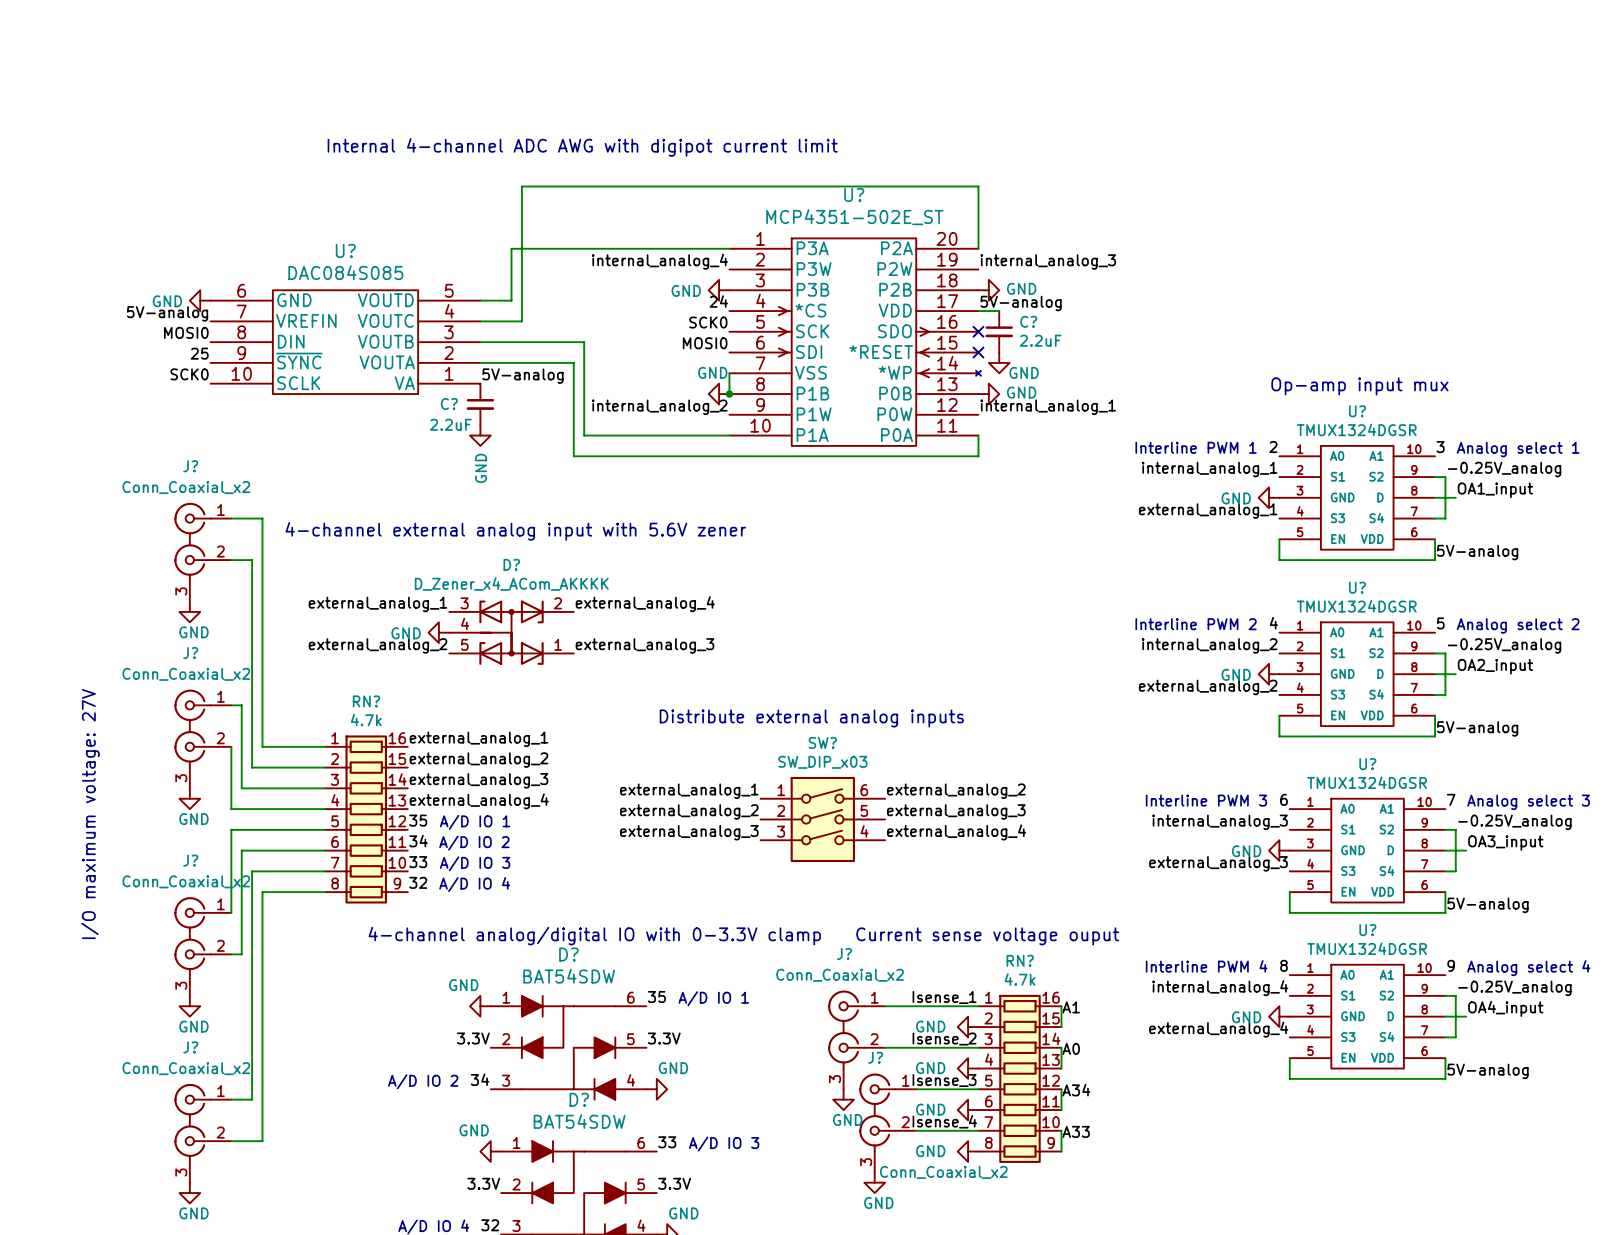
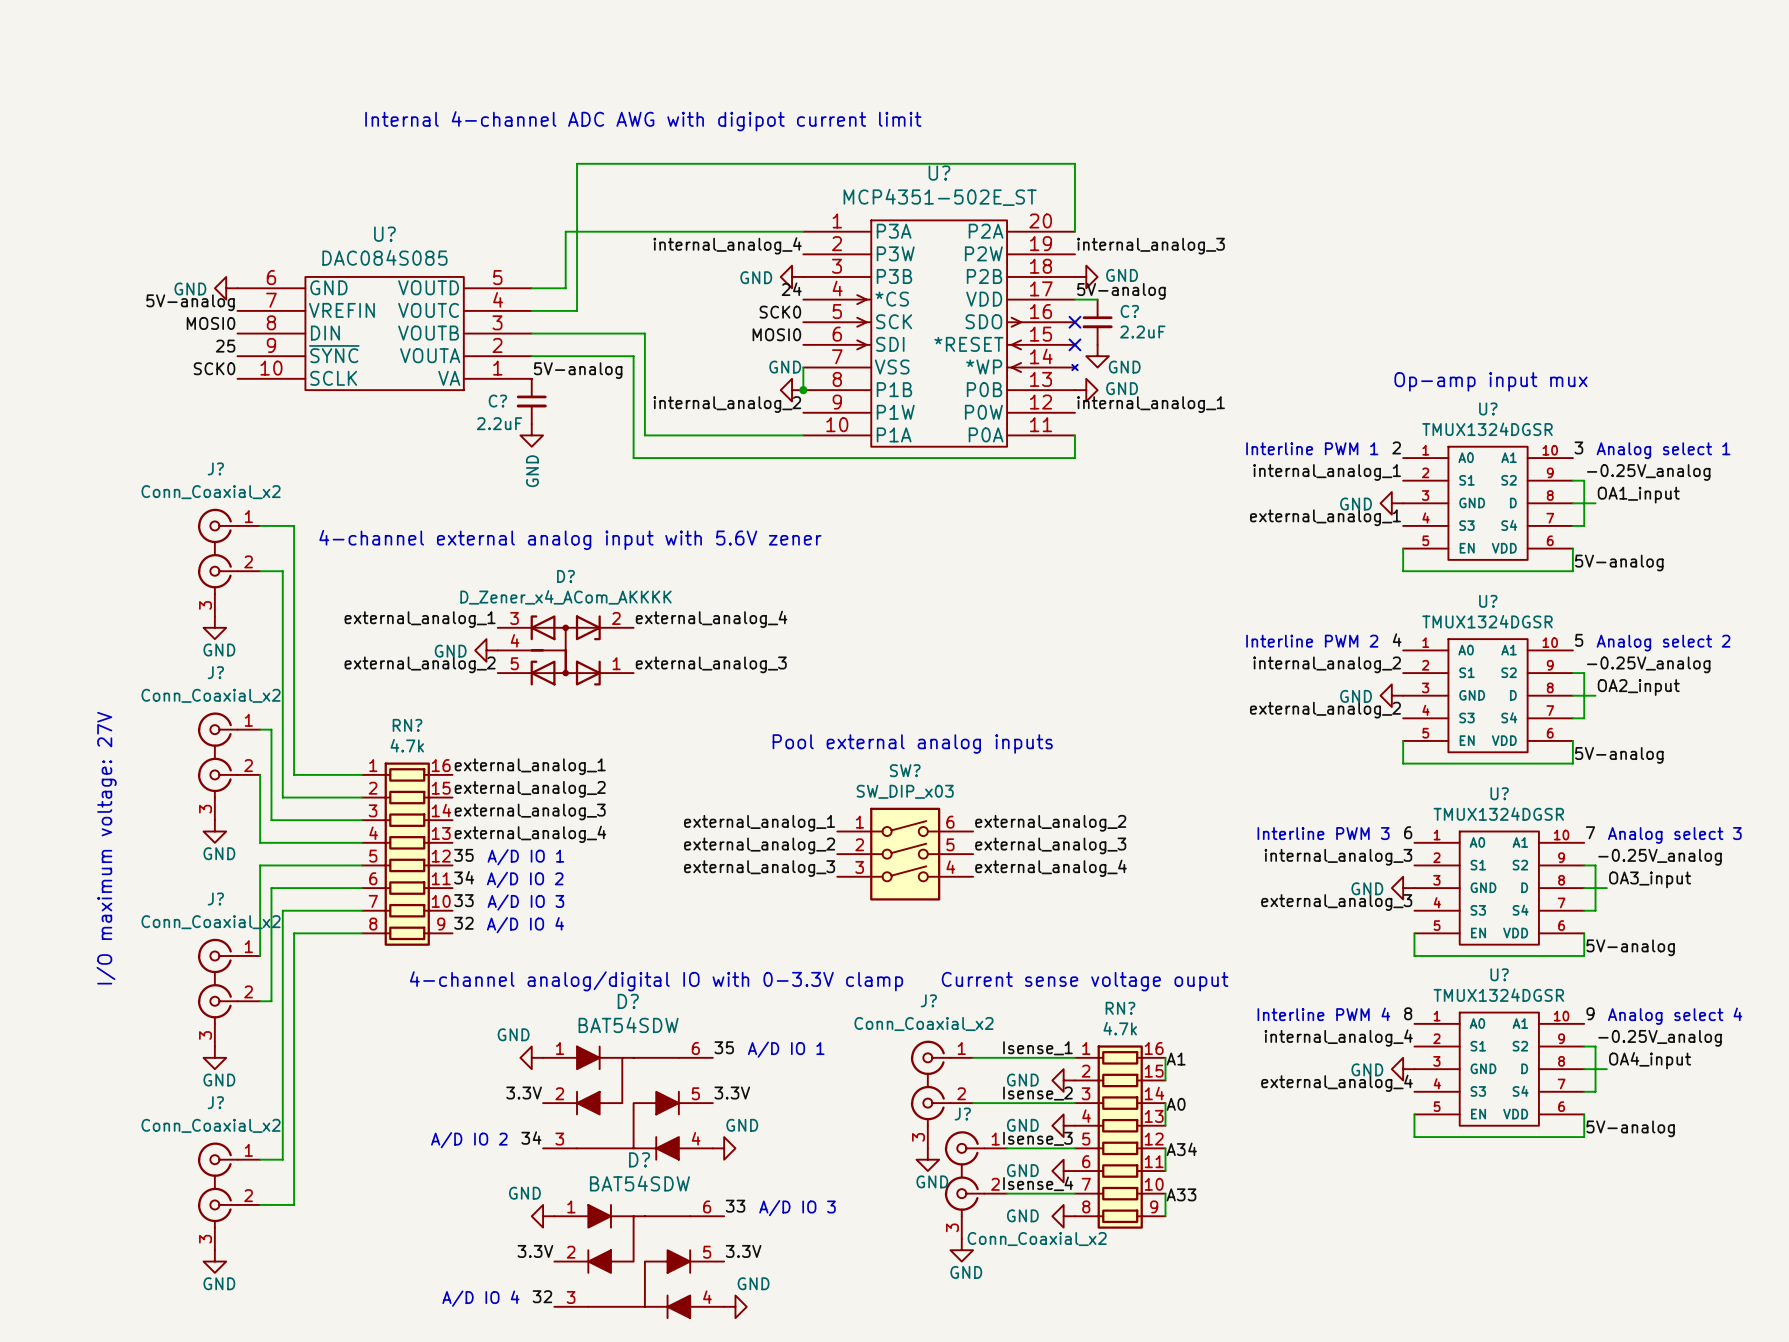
text: Distribute external analog inputs (811, 718) -> Pool external analog inputs (912, 743)

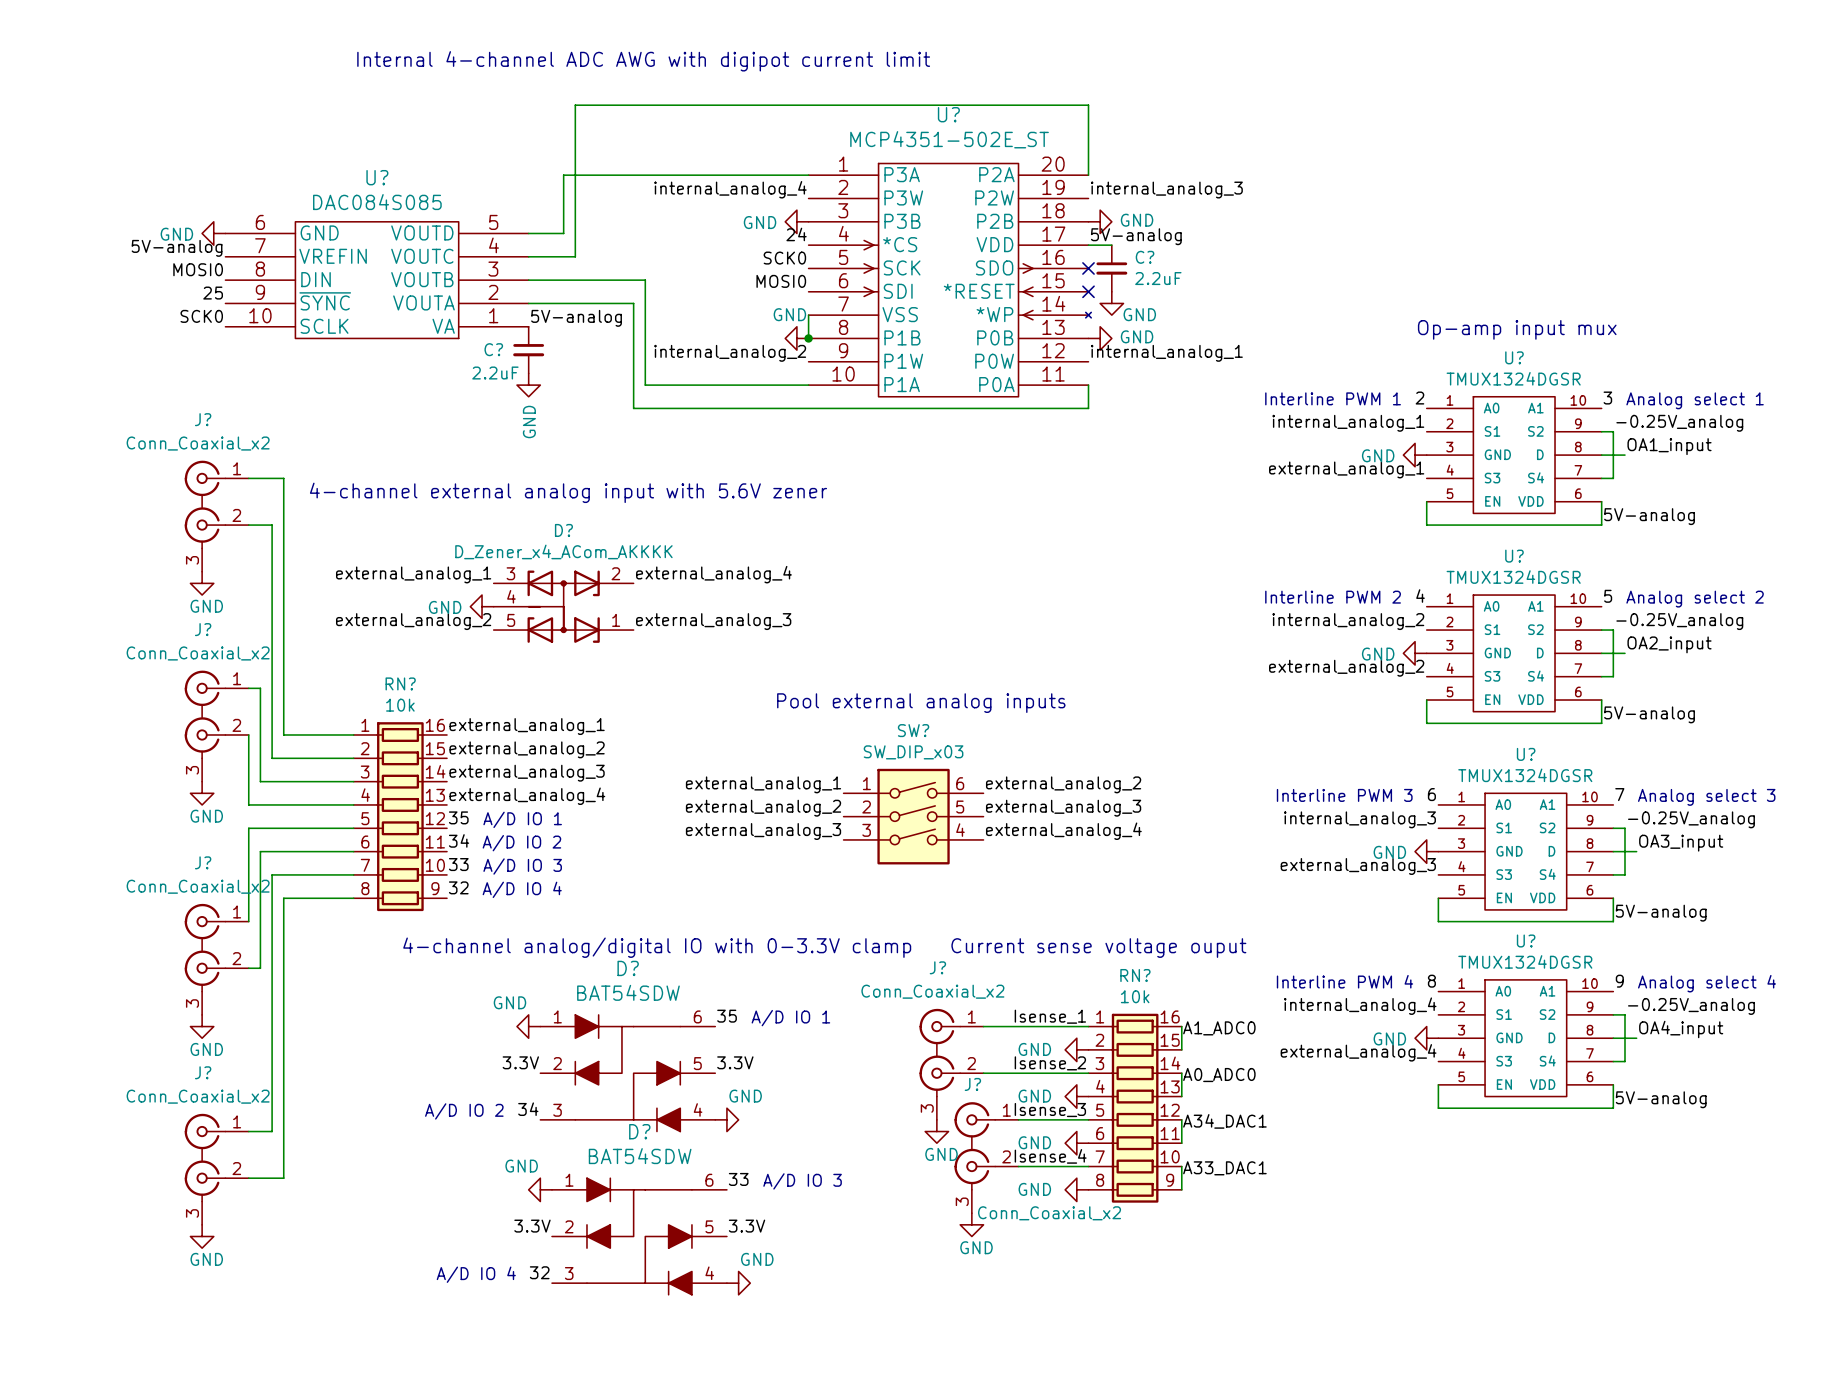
RN? value: 4.7k (407, 745) -> 10k (400, 705)
text: I/O maximum voltage: 27V (106, 848) -> none
RN? value: 4.7k (1120, 1028) -> 10k (1135, 996)
label: A1 (1176, 1059) -> A1_ADC0 (1219, 1028)
label: A0 (1176, 1104) -> A0_ADC0 (1219, 1075)
label: A34 (1181, 1149) -> A34_DAC1 (1224, 1121)
label: A33 (1181, 1194) -> A33_DAC1 (1224, 1168)

